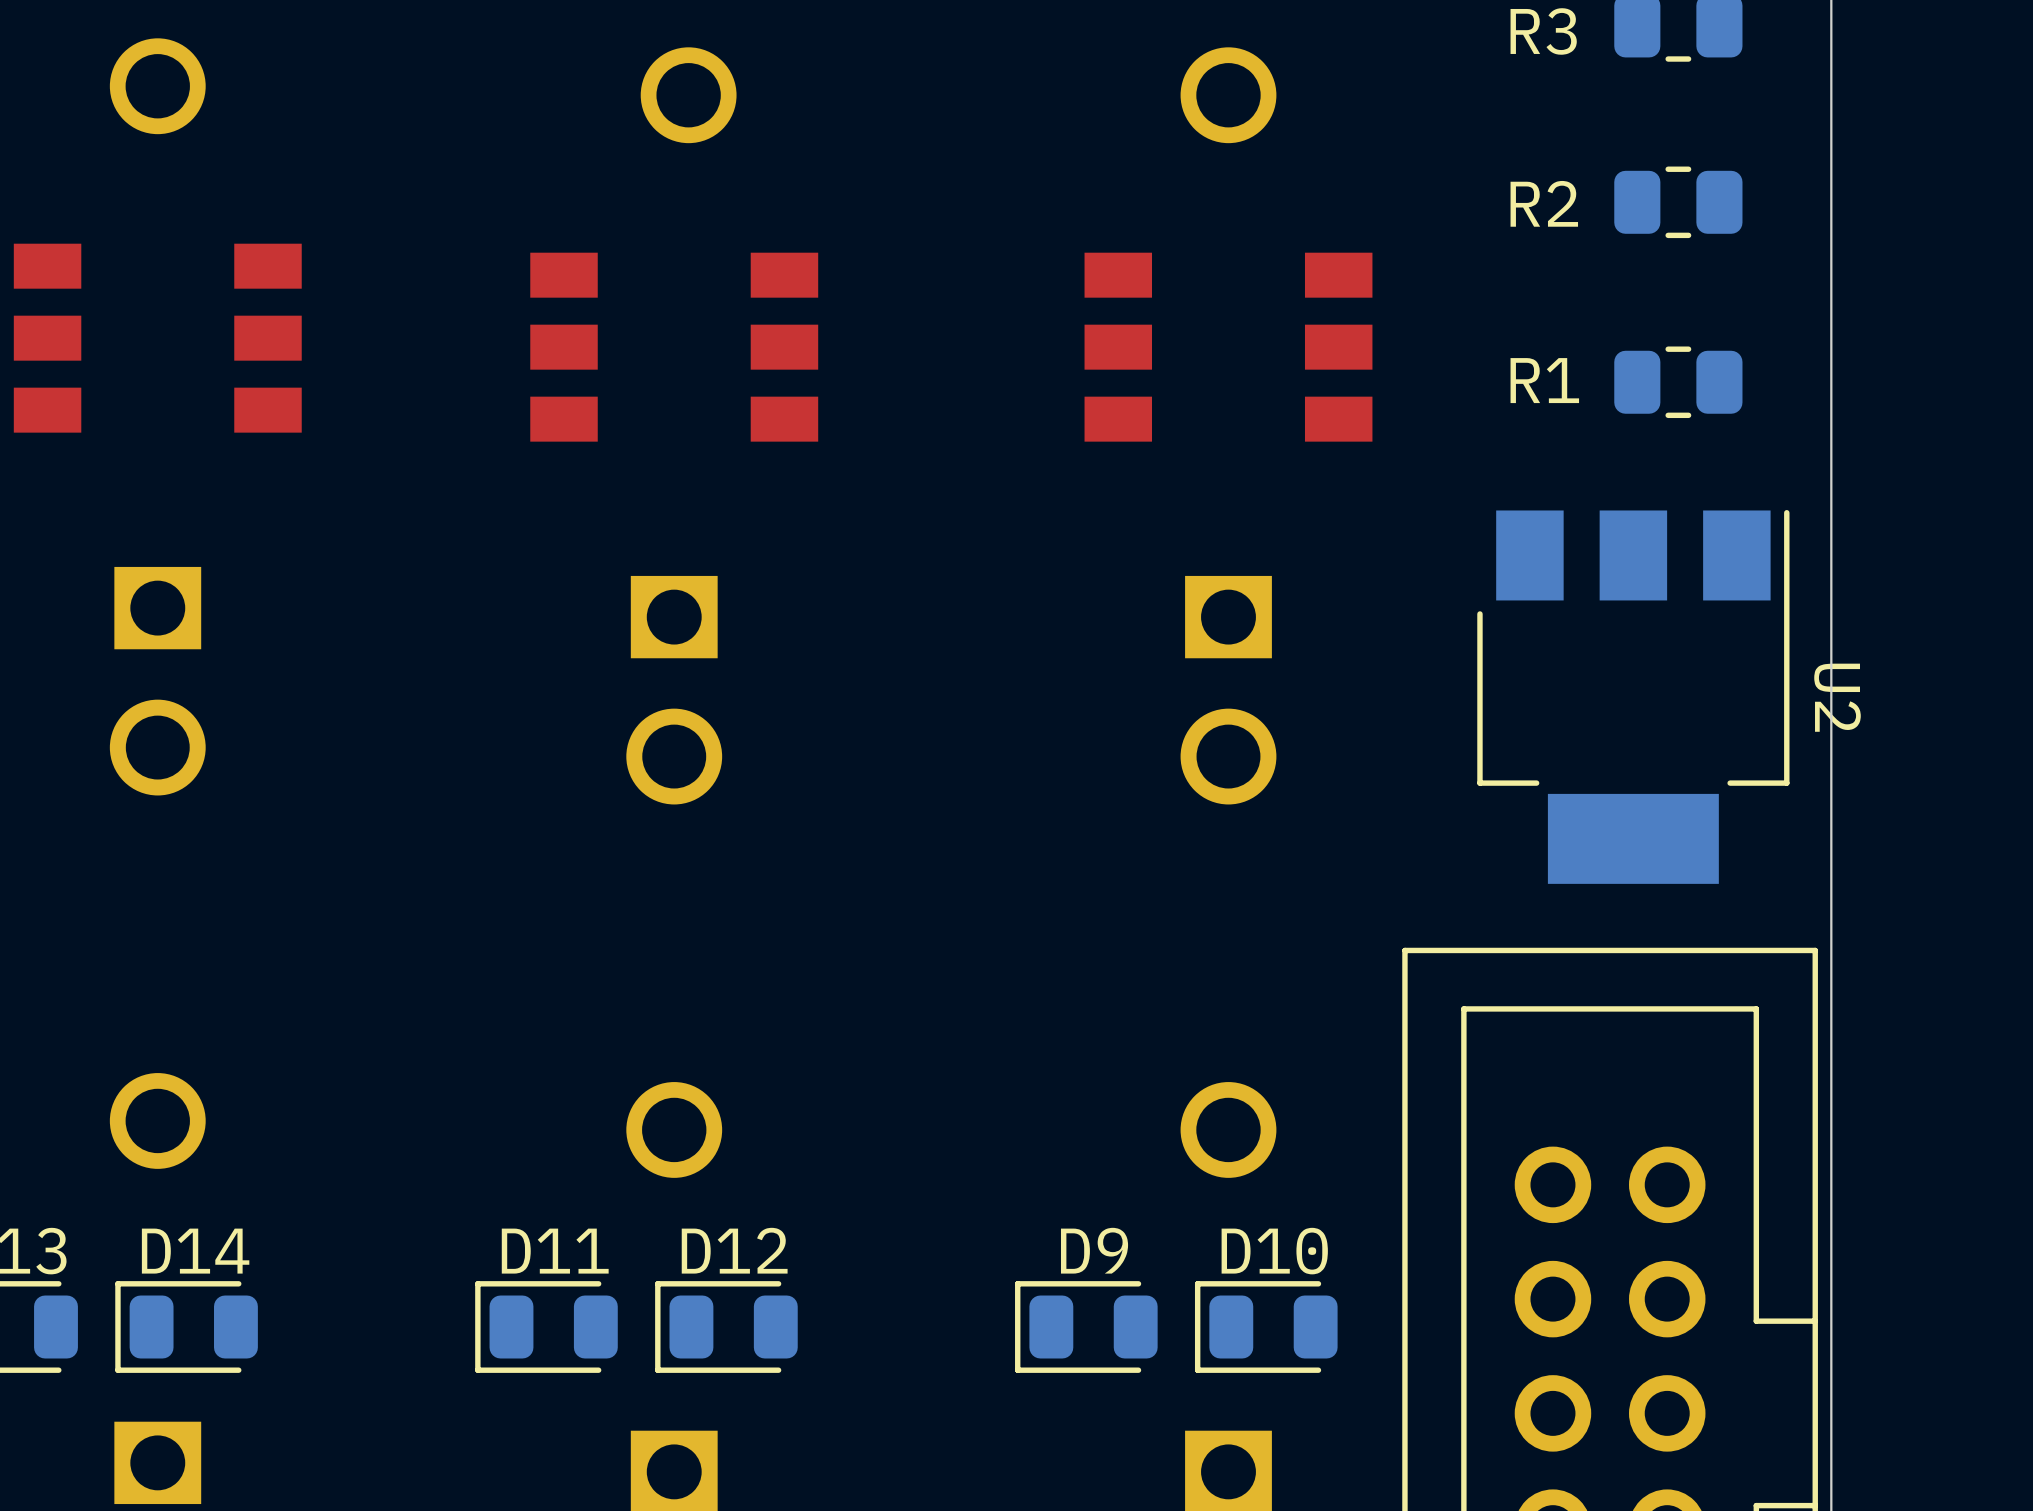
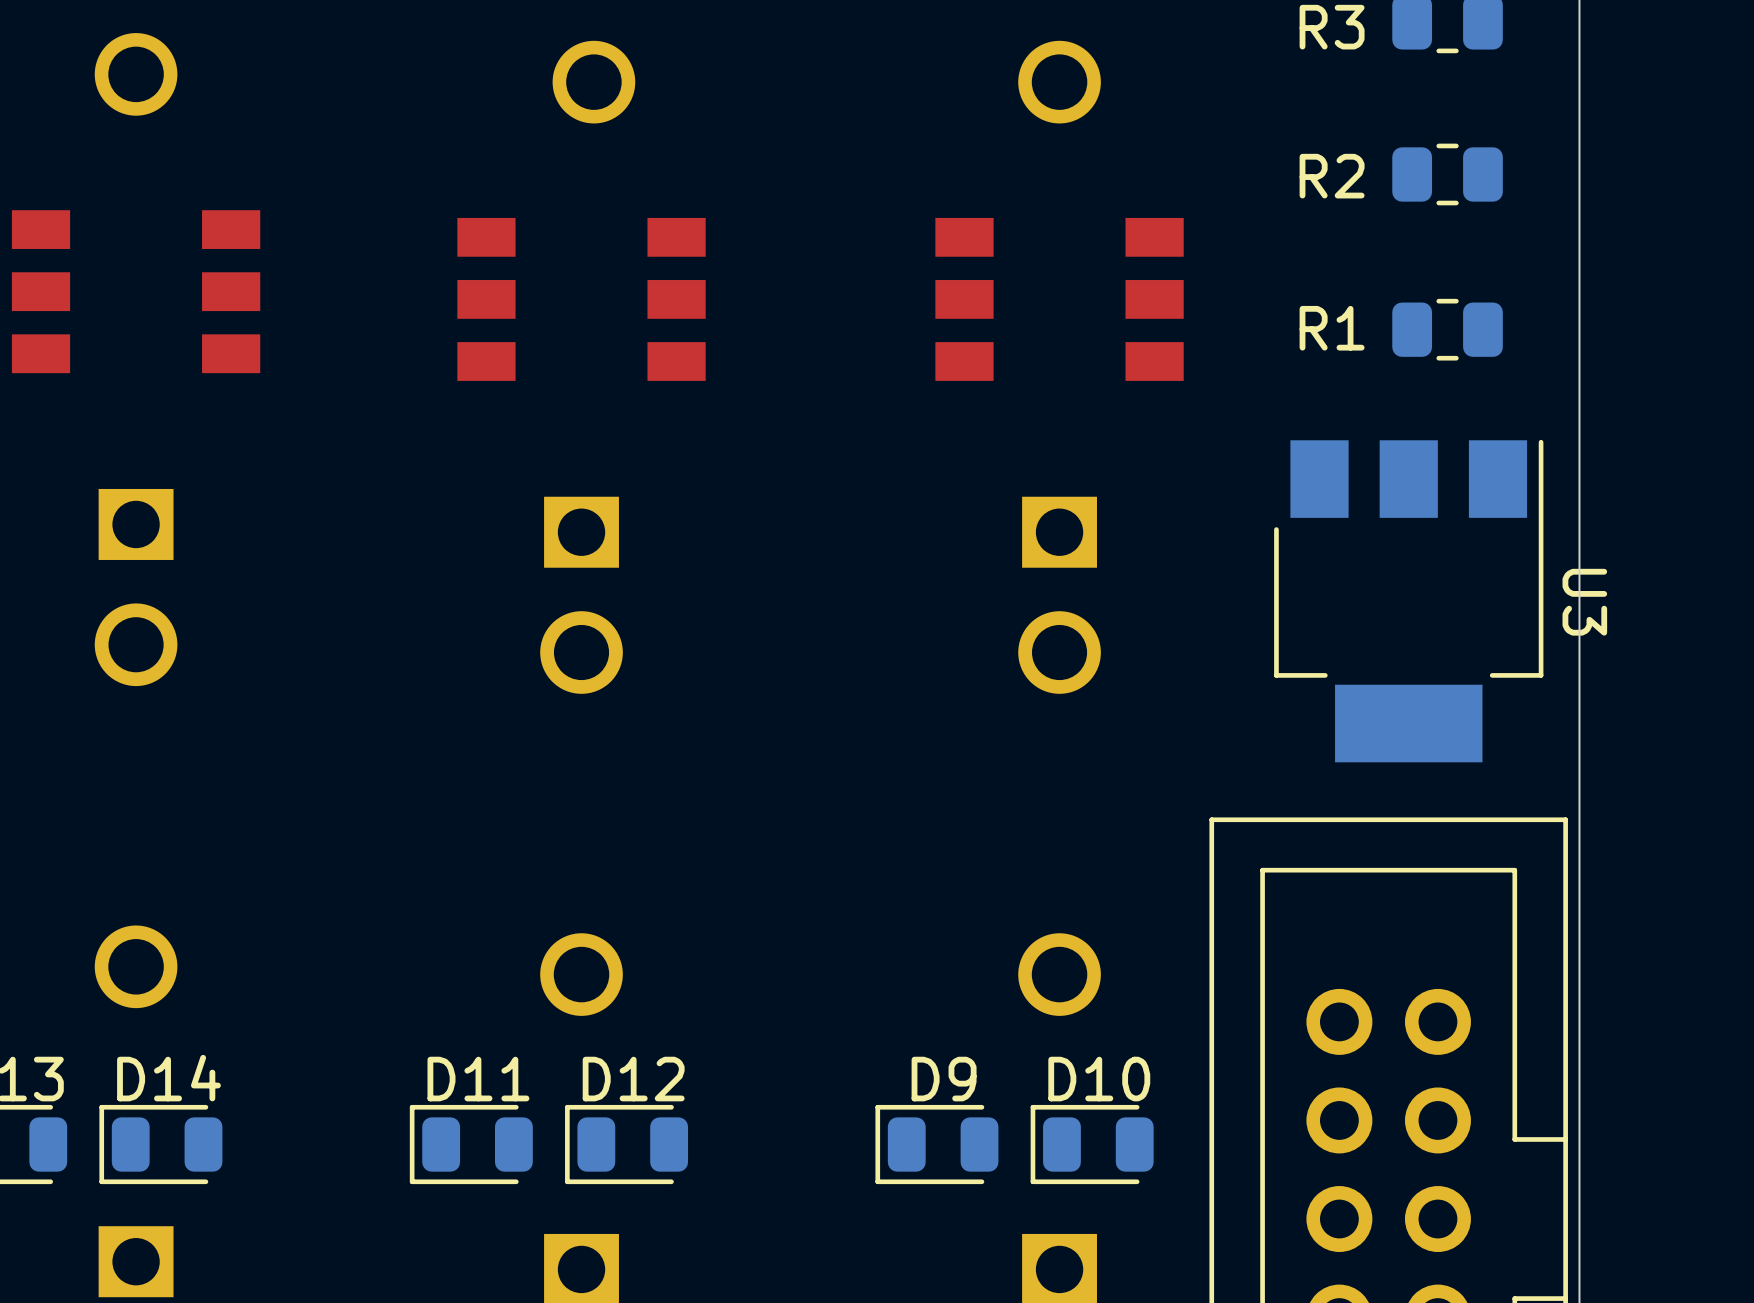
U2 name: U2 (1837, 697) -> U3 (1584, 602)

